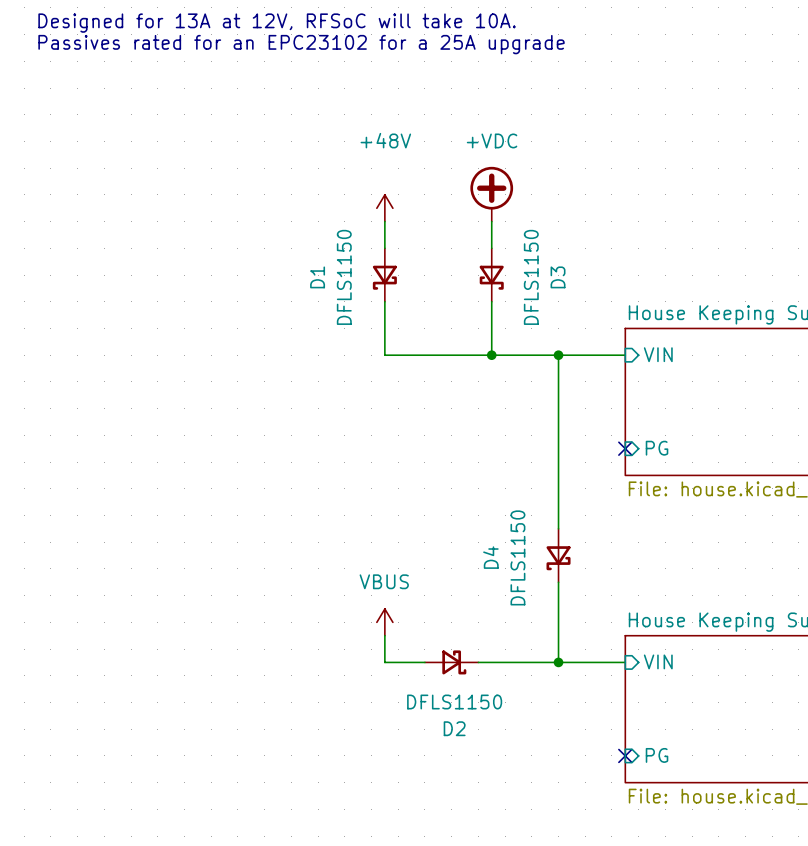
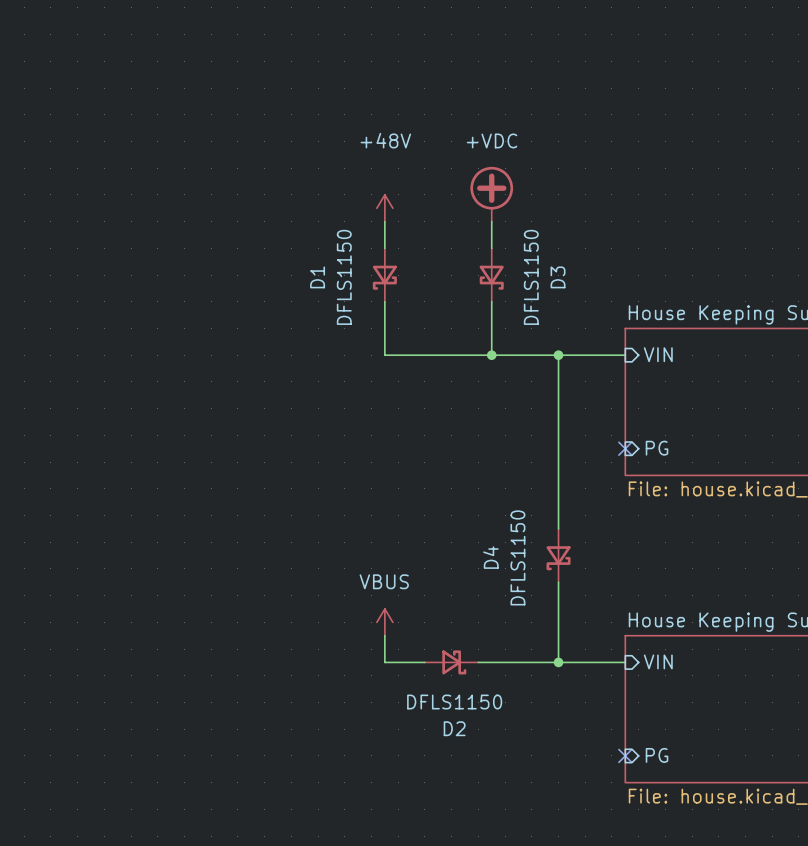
text: Designed for 13A at 12V, RFSoC will take 10A. (277, 23) -> none
text: Passives rated for an EPC23102 for a 25A upgrade (301, 44) -> none

